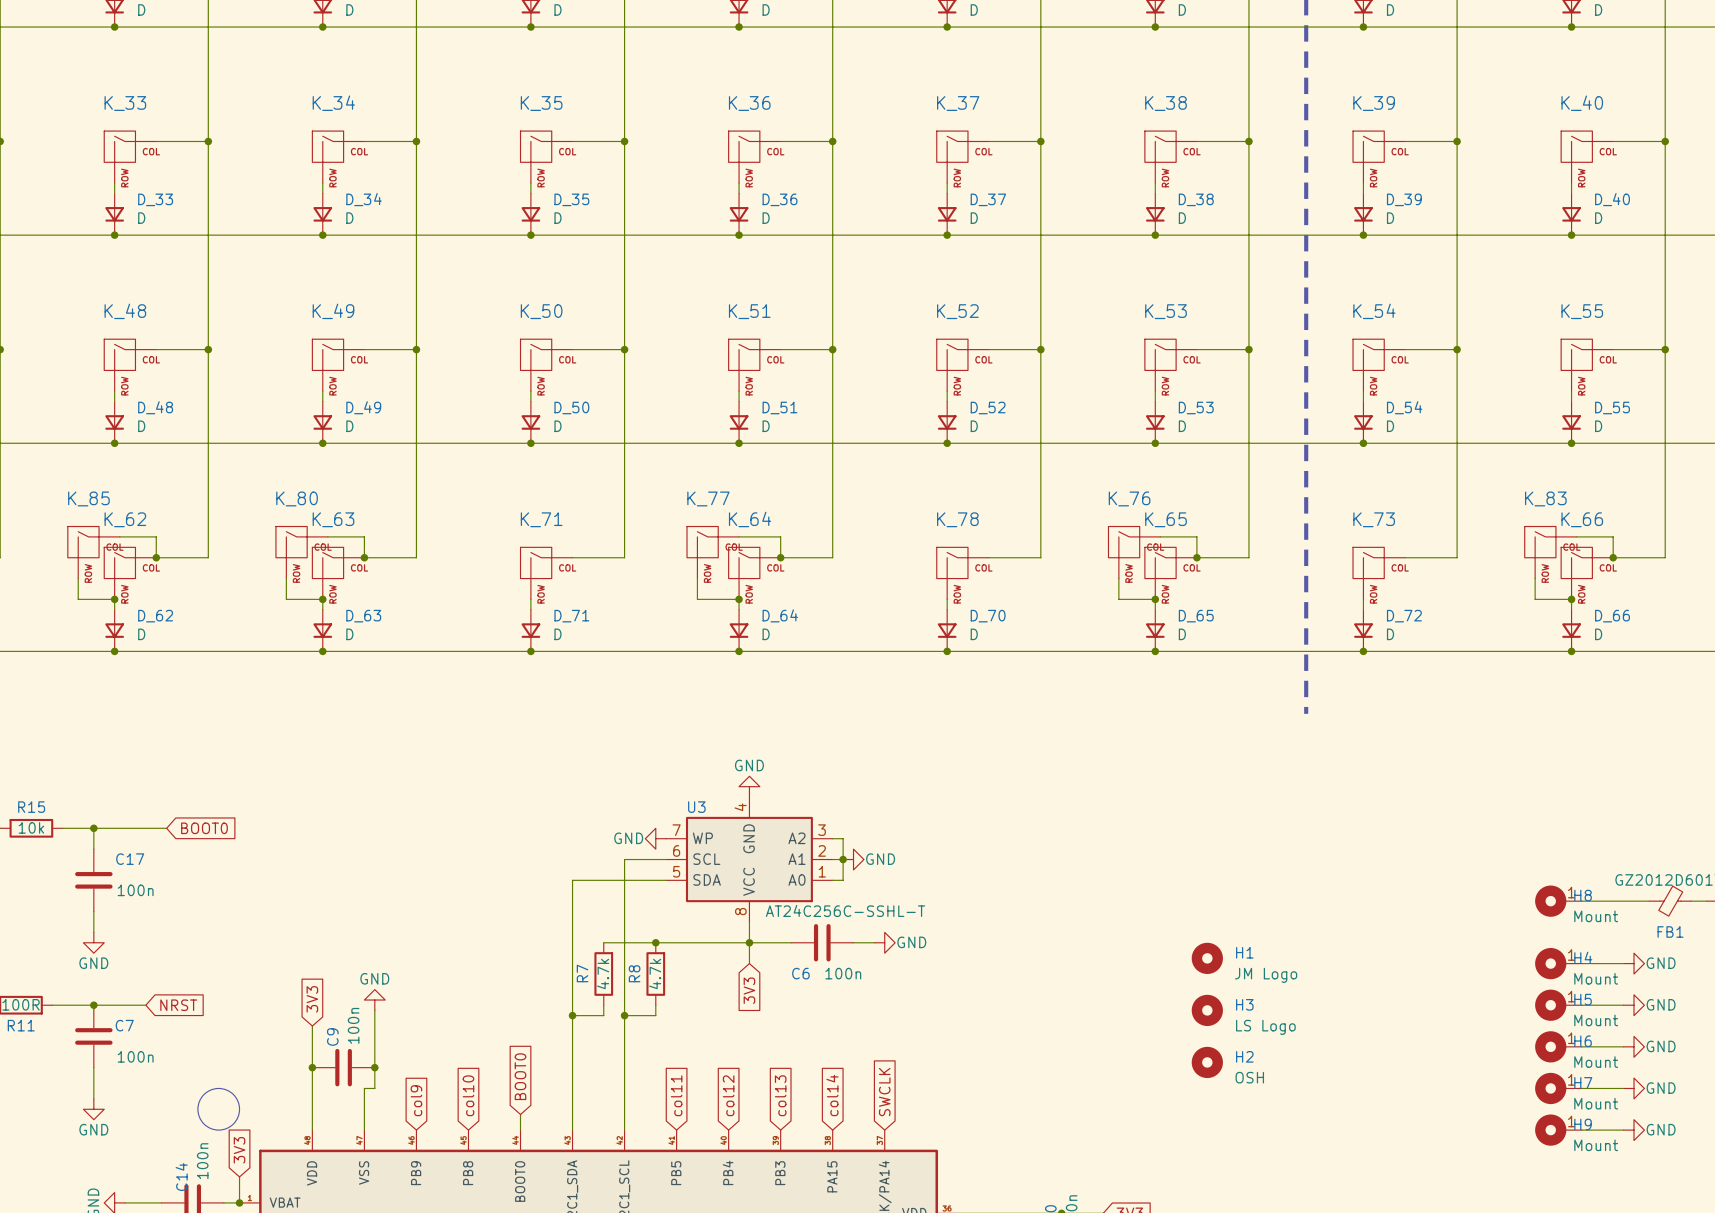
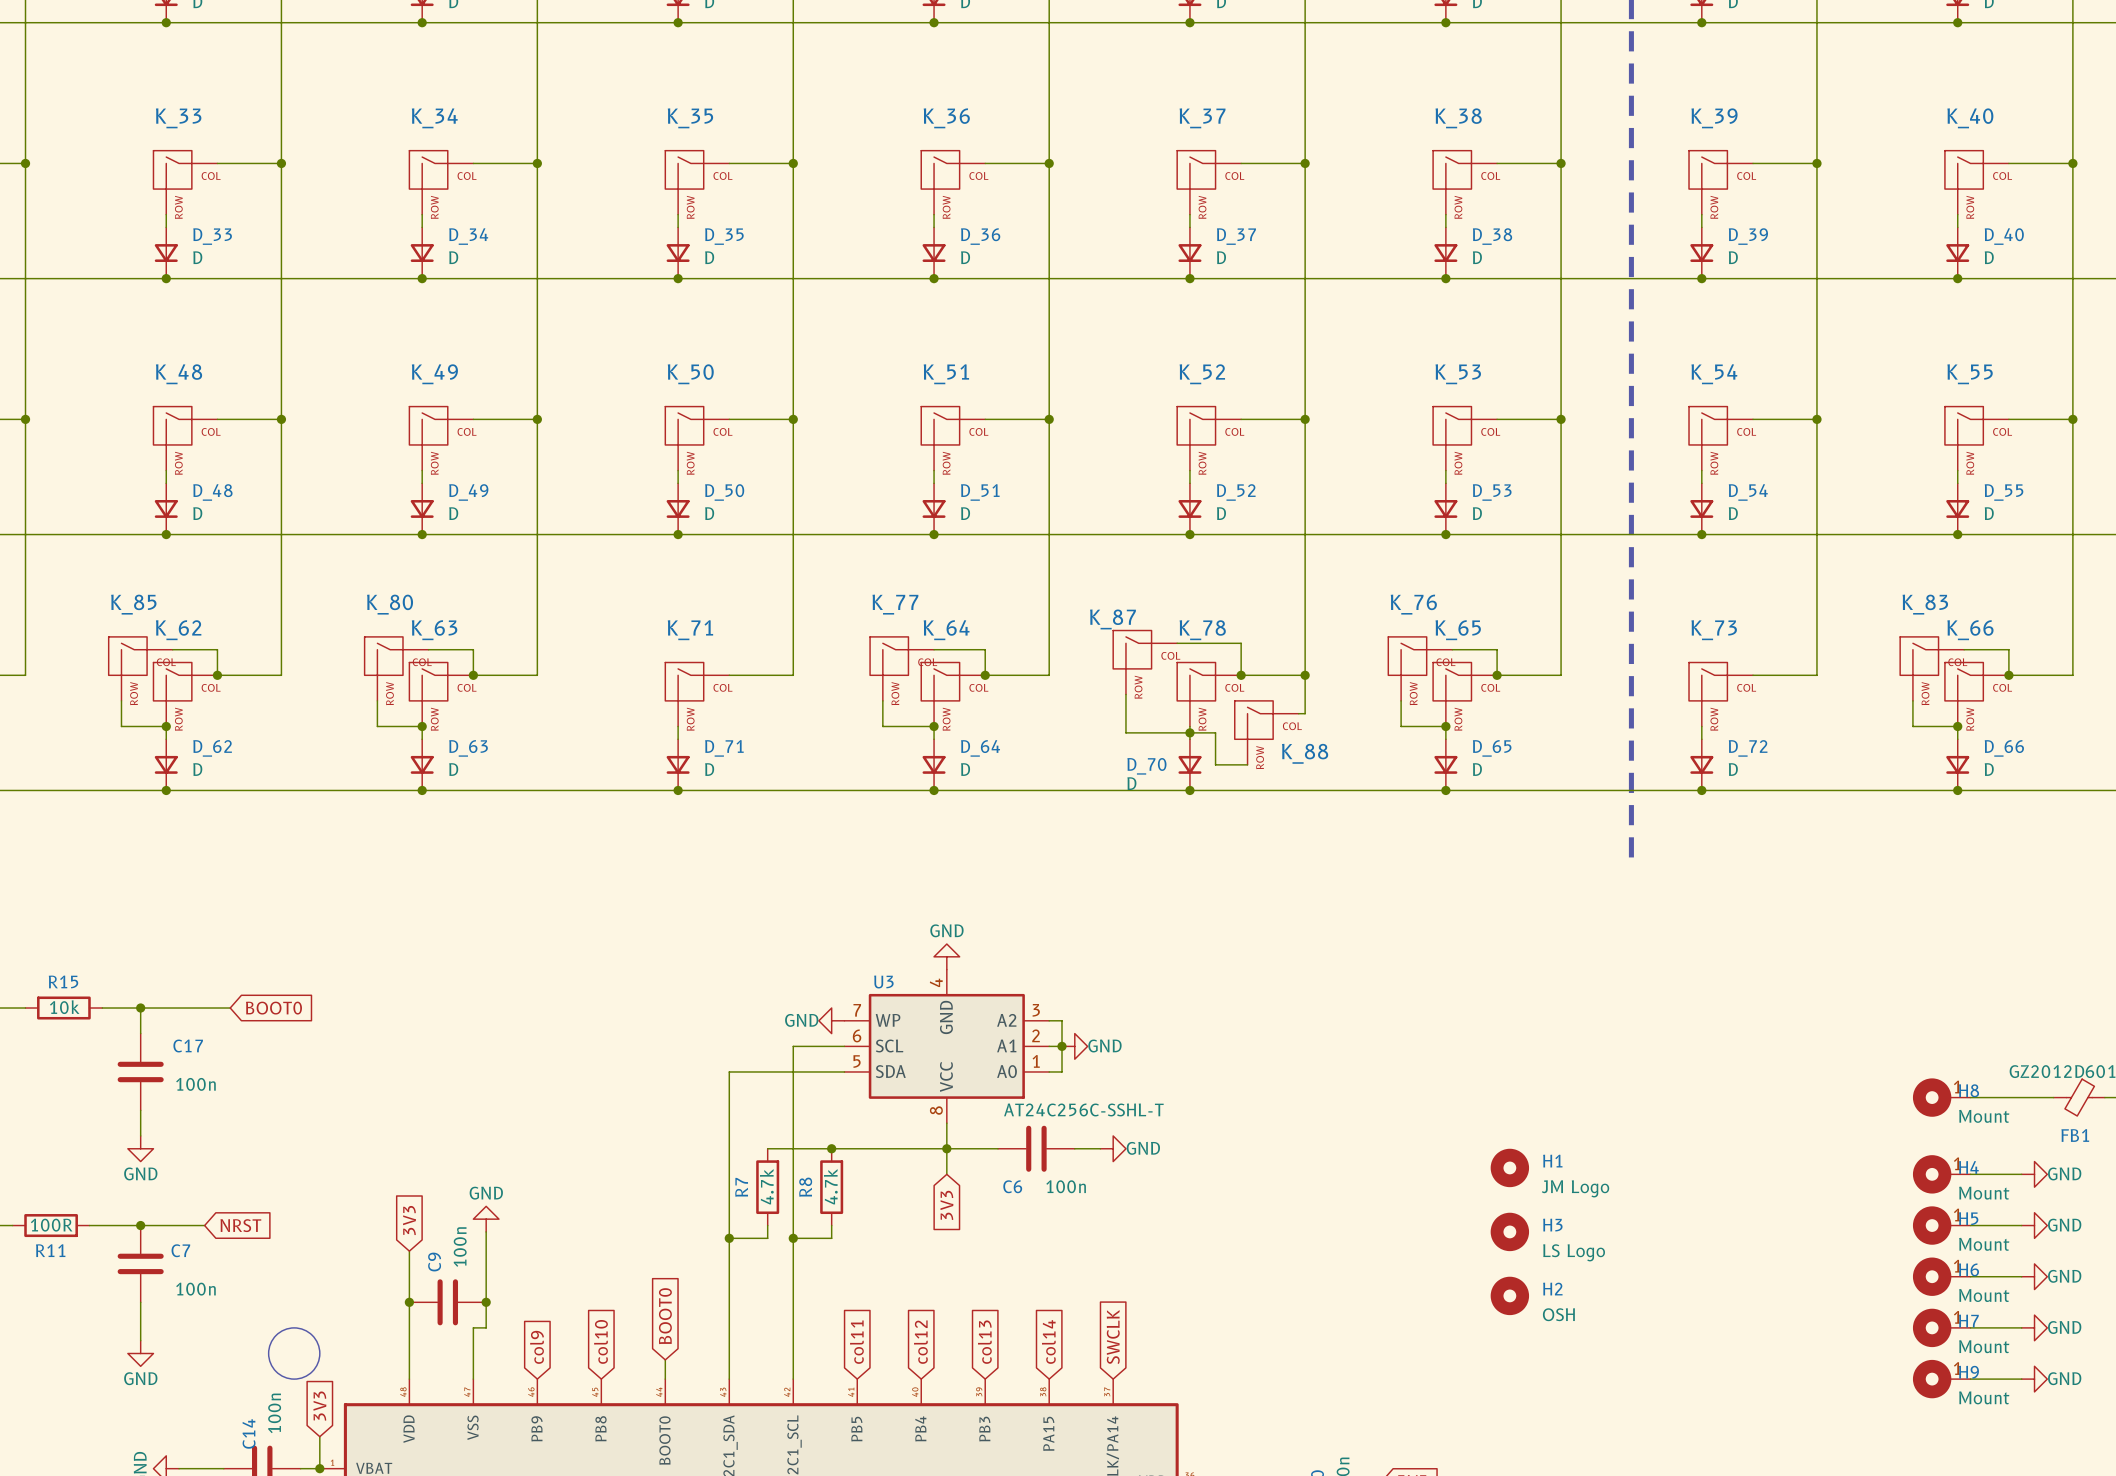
wire: none -> (1177, 643) (1241, 643) (1241, 675)
K_87: none -> (1145, 662)
junction: none -> (1241, 675)
wire: none -> (1305, 675) (1305, 713) (1298, 713)
junction: none -> (1305, 675)
wire: none -> (1125, 694) (1125, 732) (1215, 732) (1215, 764) (1247, 764)
junction: none -> (1189, 732)
K_88: none -> (1266, 732)
D_70 name position: D_70 (988, 616) -> D_70 (1146, 766)
D_70 value position: D (974, 634) -> D (1131, 783)

